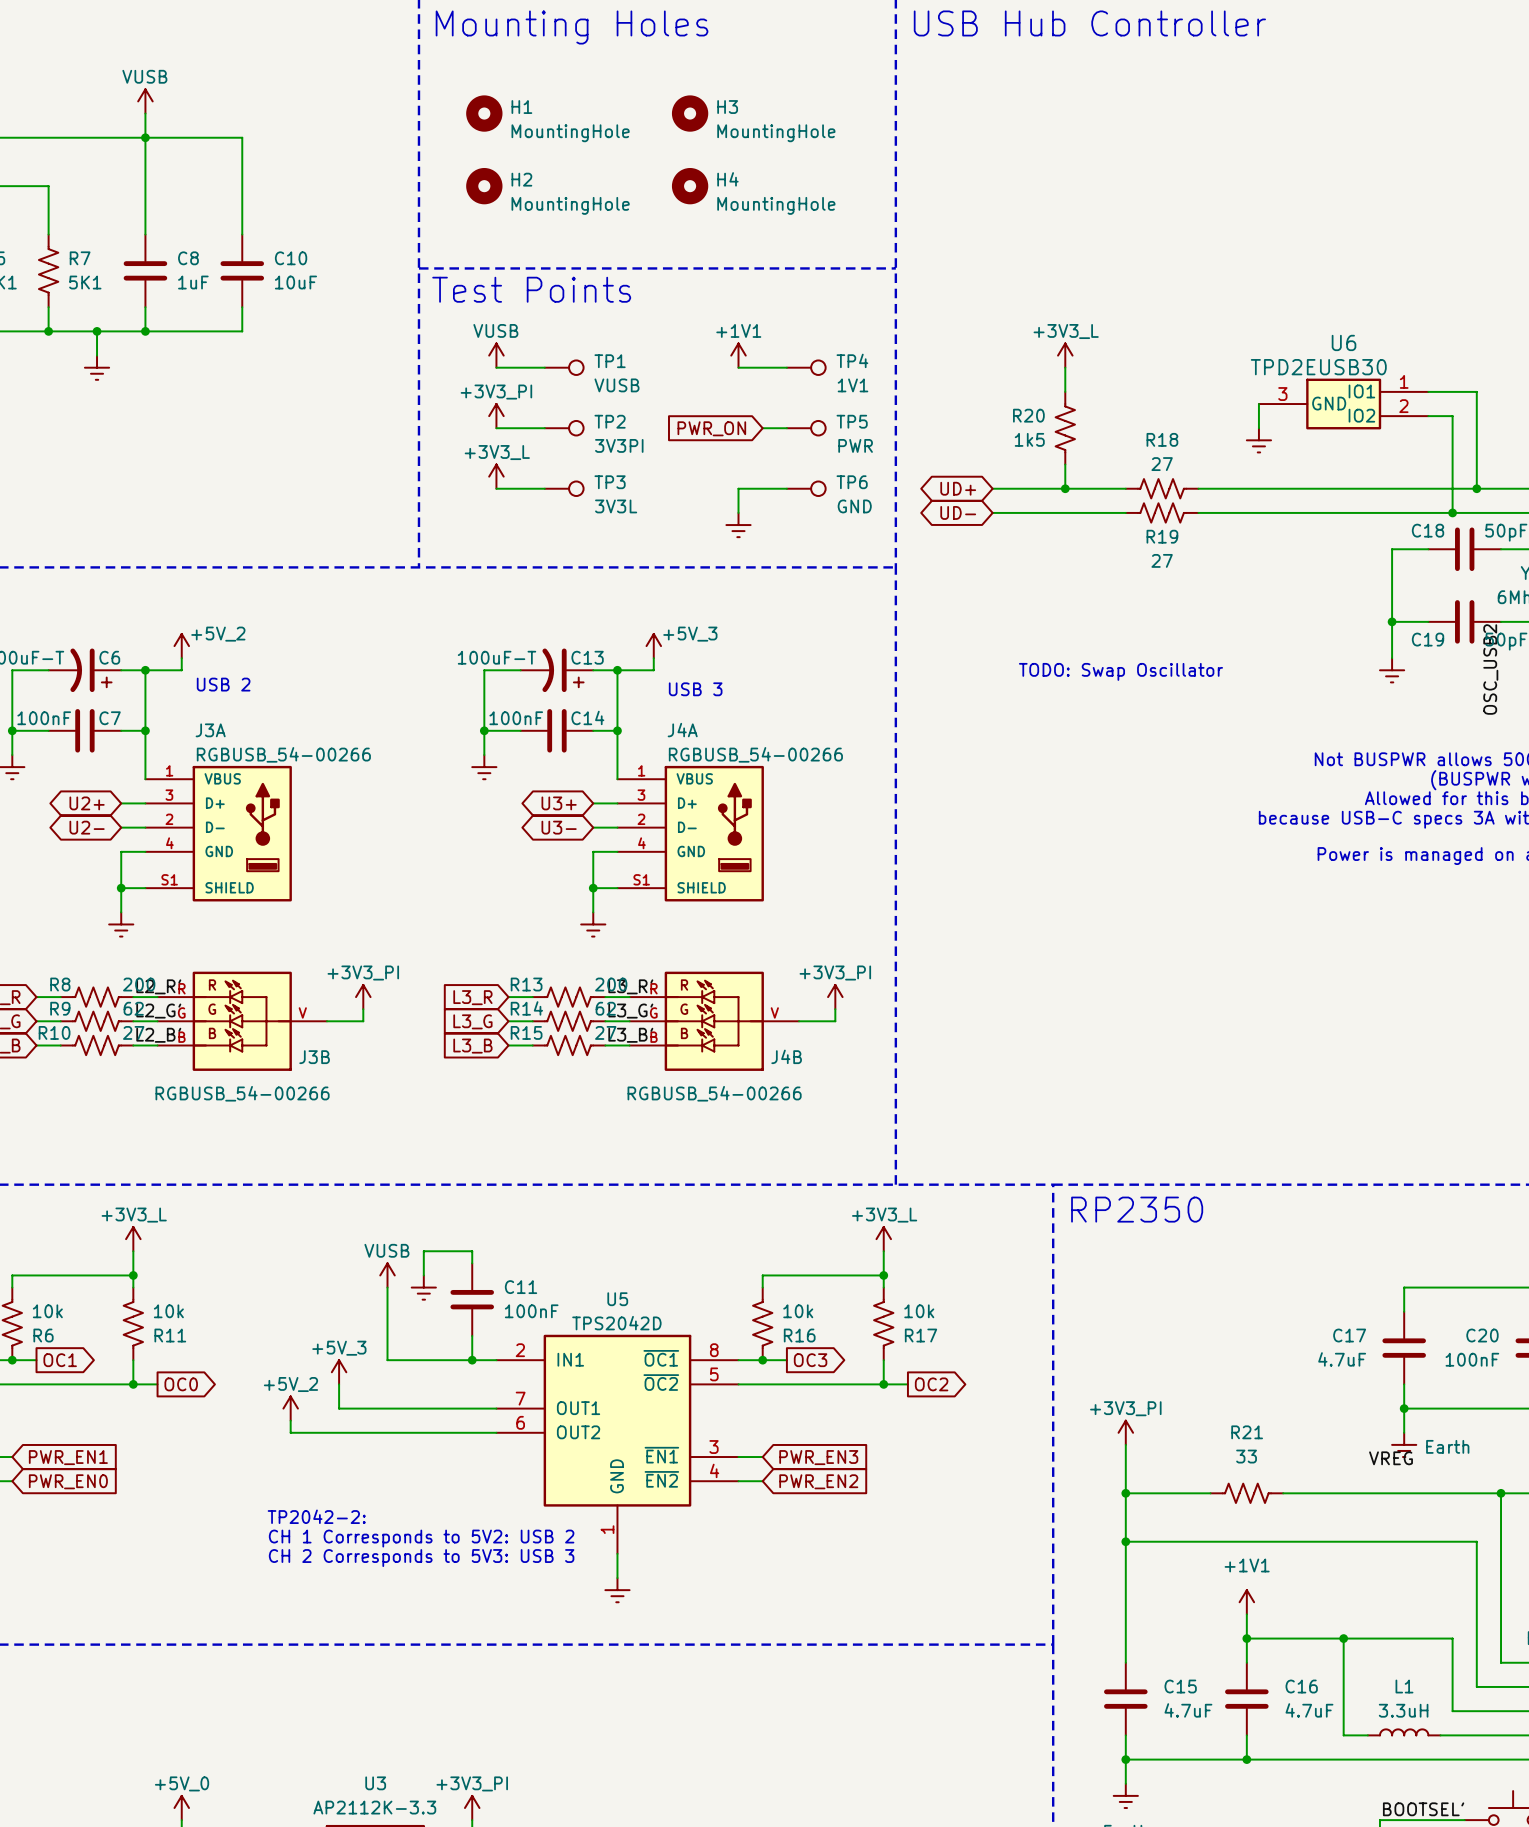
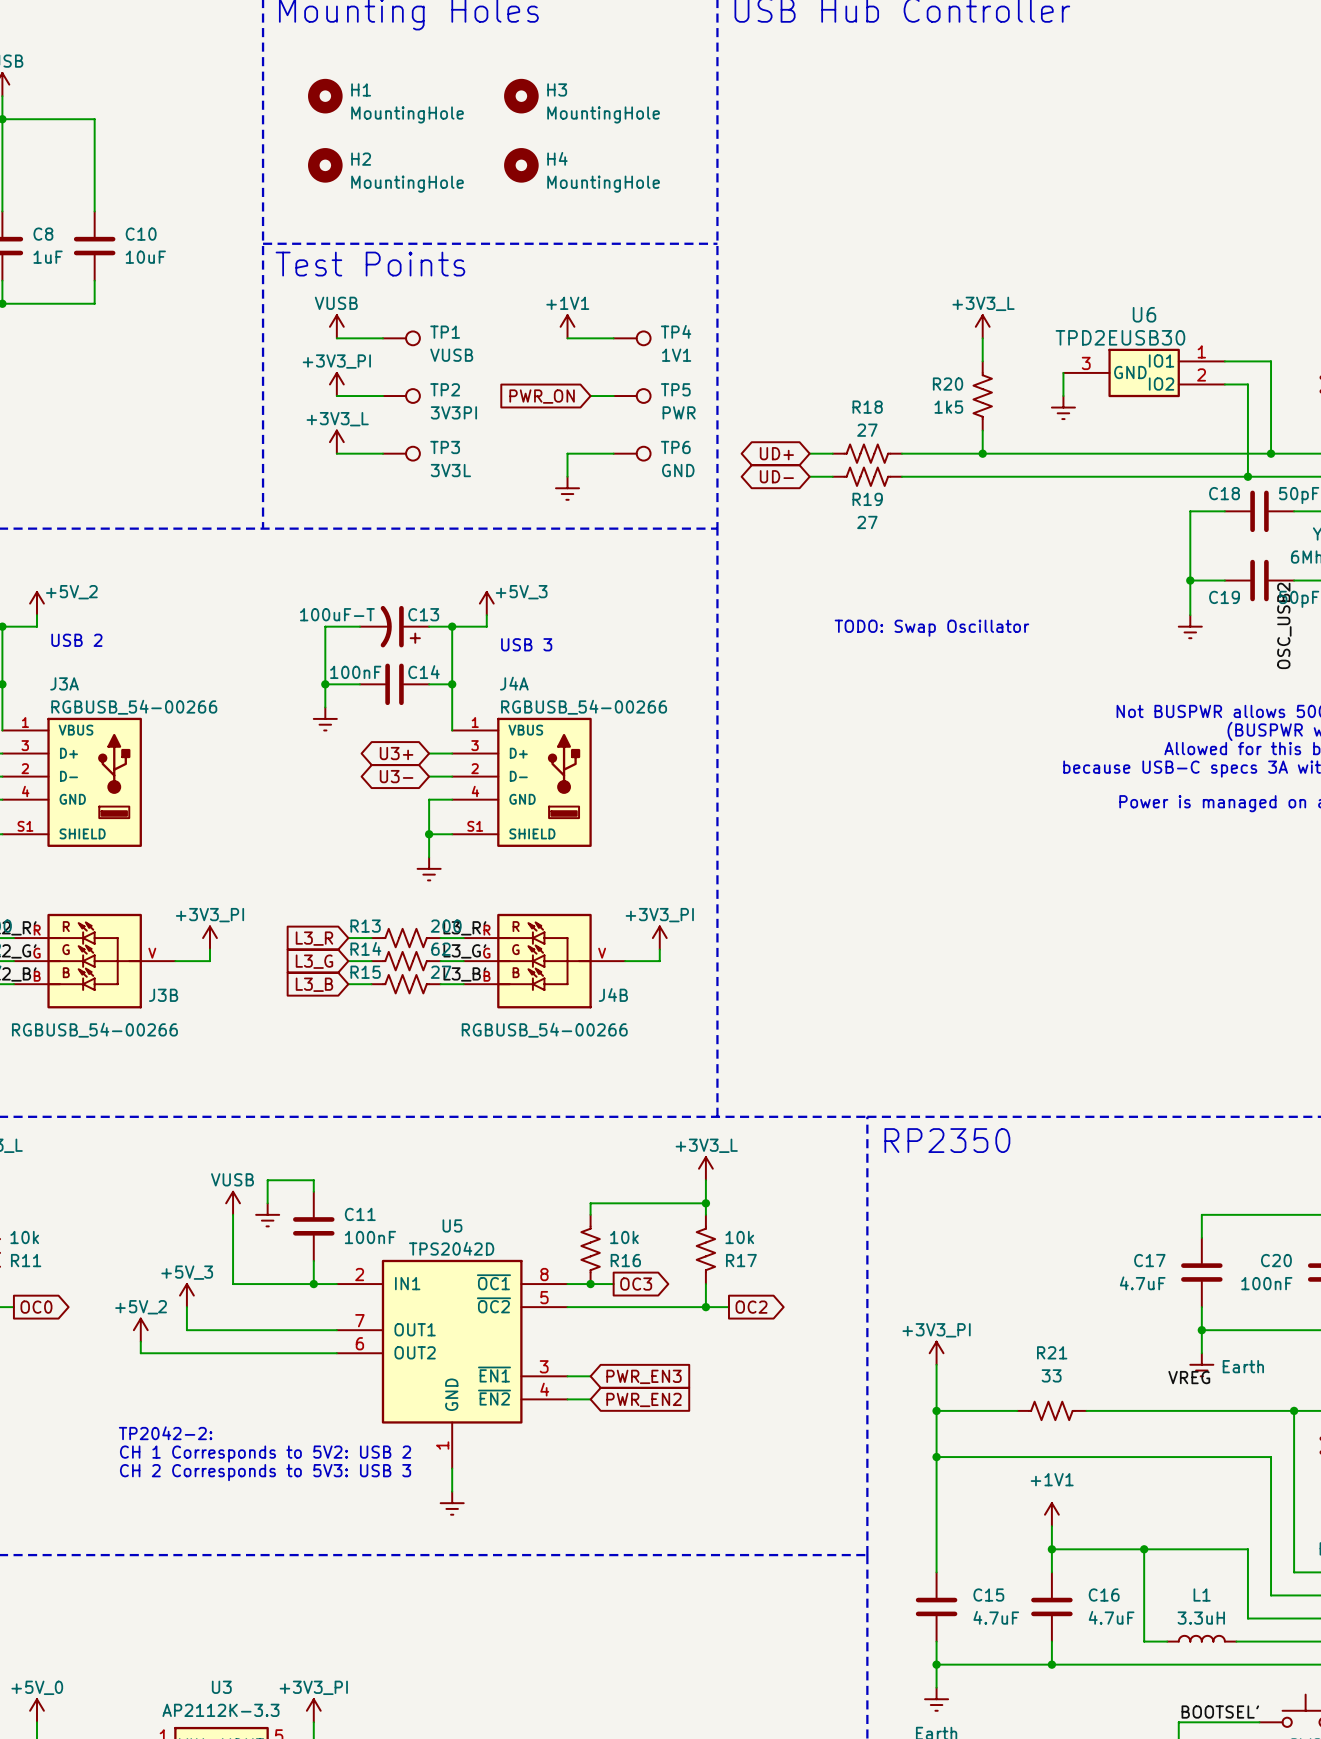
power symbol position: +3V3_L (1065, 355) -> +3V3_L (982, 326)
wire: (1065, 367) (1065, 391) -> (982, 338) (982, 361)
R20 position: (1065, 428) -> (982, 396)
wire: (1065, 464) (1065, 488) -> (982, 430) (982, 453)
junction: (1065, 488) -> none
R18 position: (1162, 488) -> (867, 453)
junction: none -> (982, 453)
R19 position: (1162, 512) -> (867, 476)

